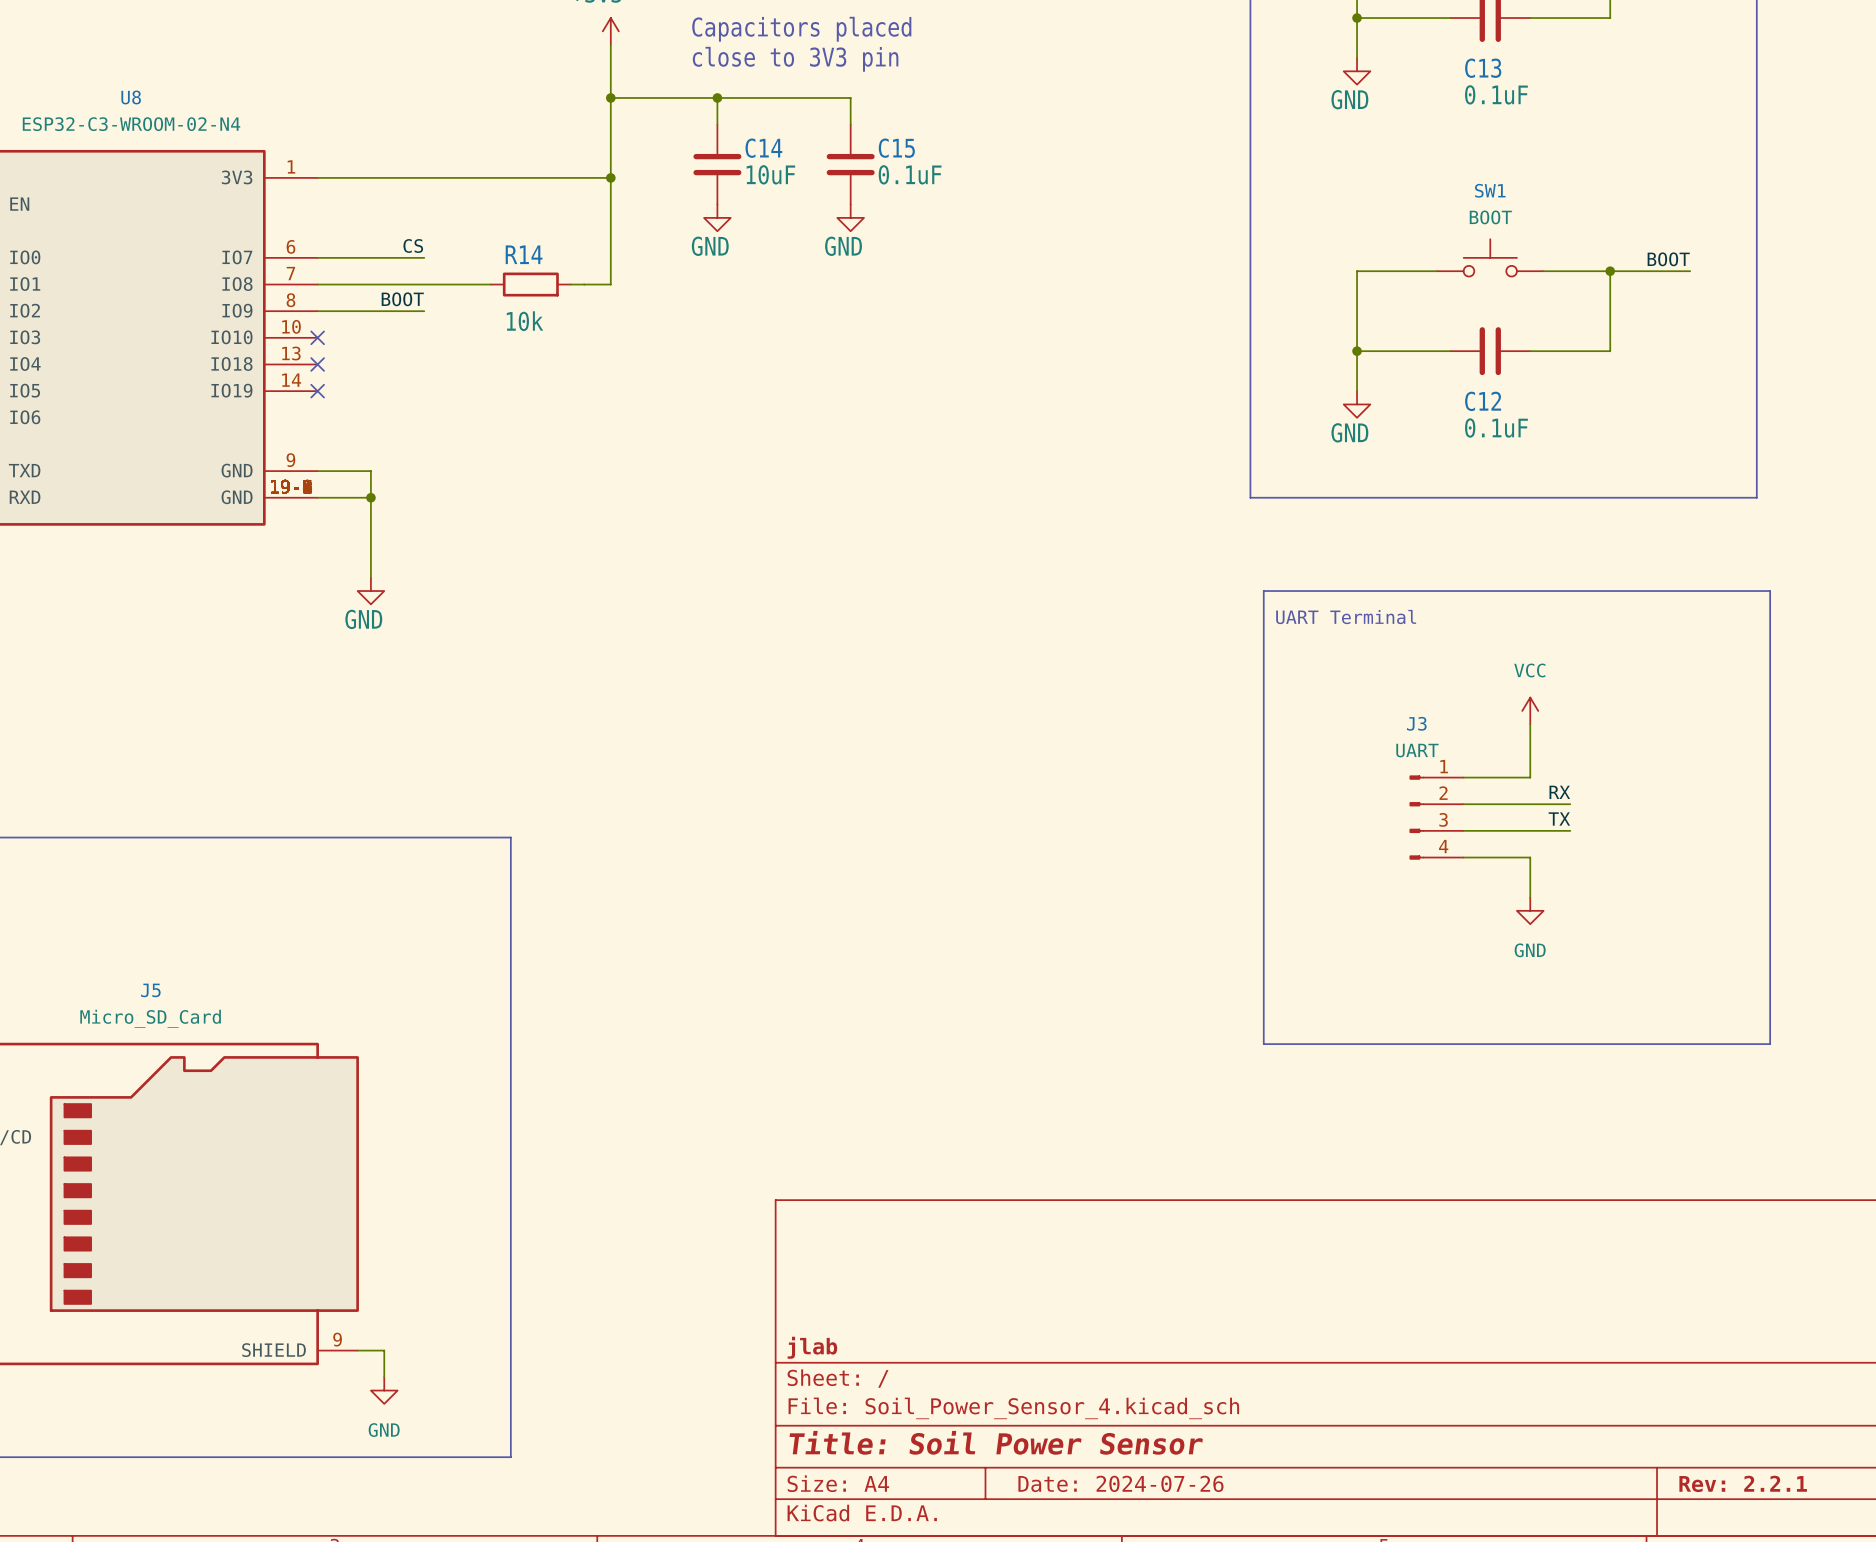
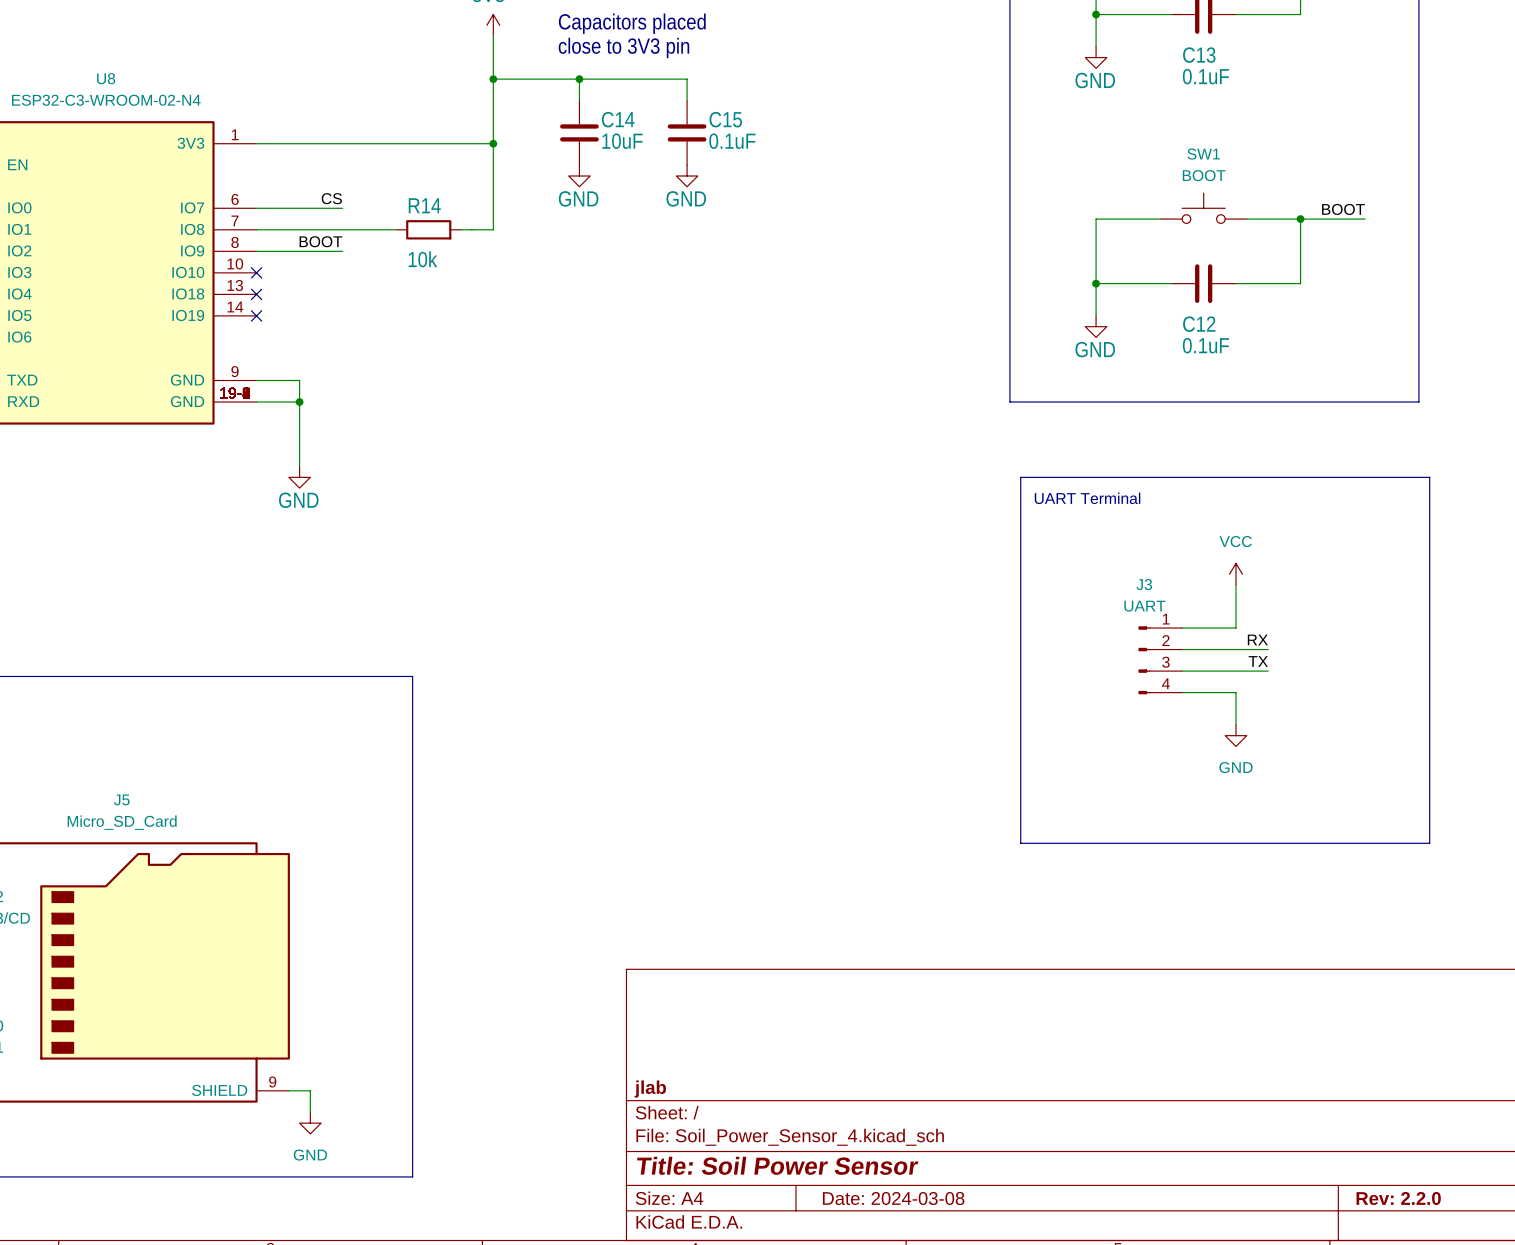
title block: Date: 2024-07-26 (1120, 1483) -> Date: 2024-03-08 (893, 1198)
title block: Rev: 2.2.1 (1743, 1483) -> Rev: 2.2.0 (1398, 1198)

